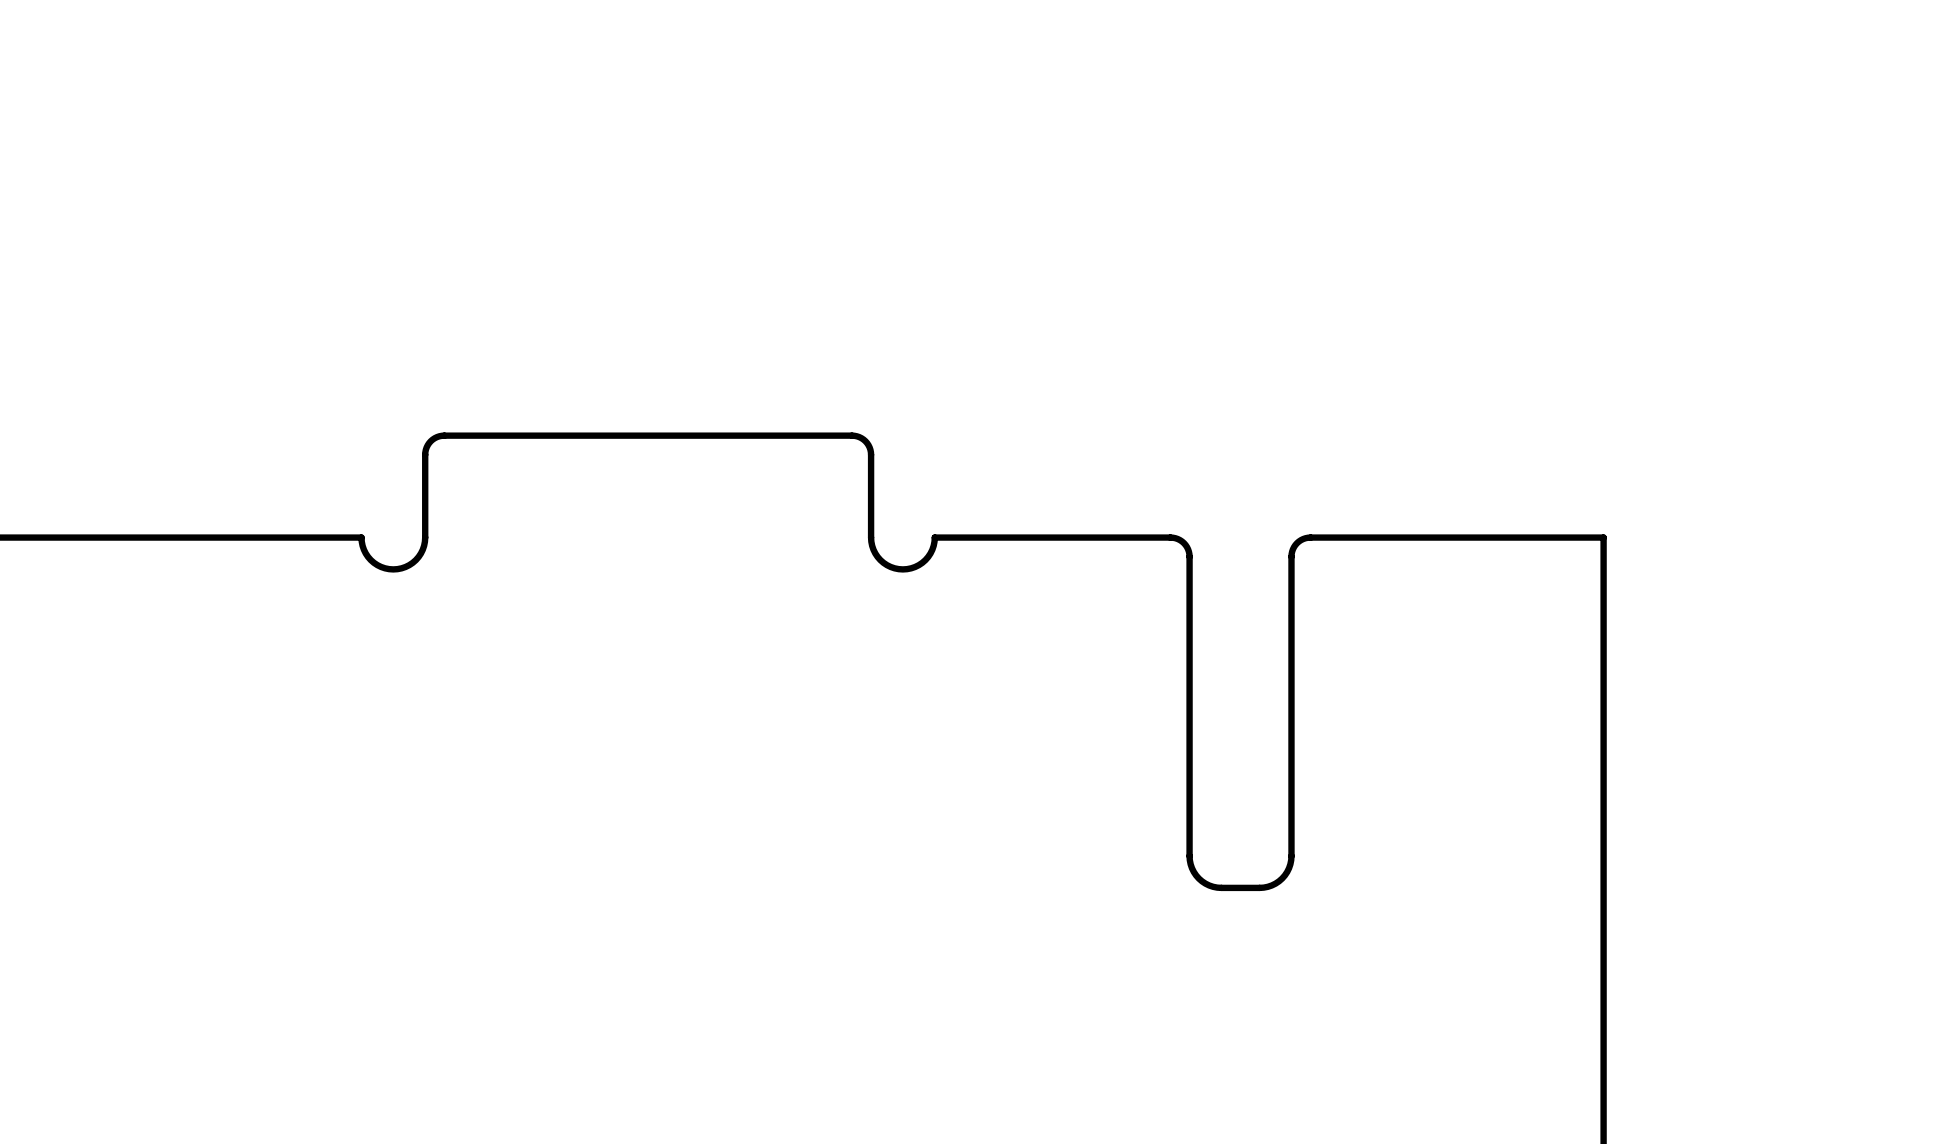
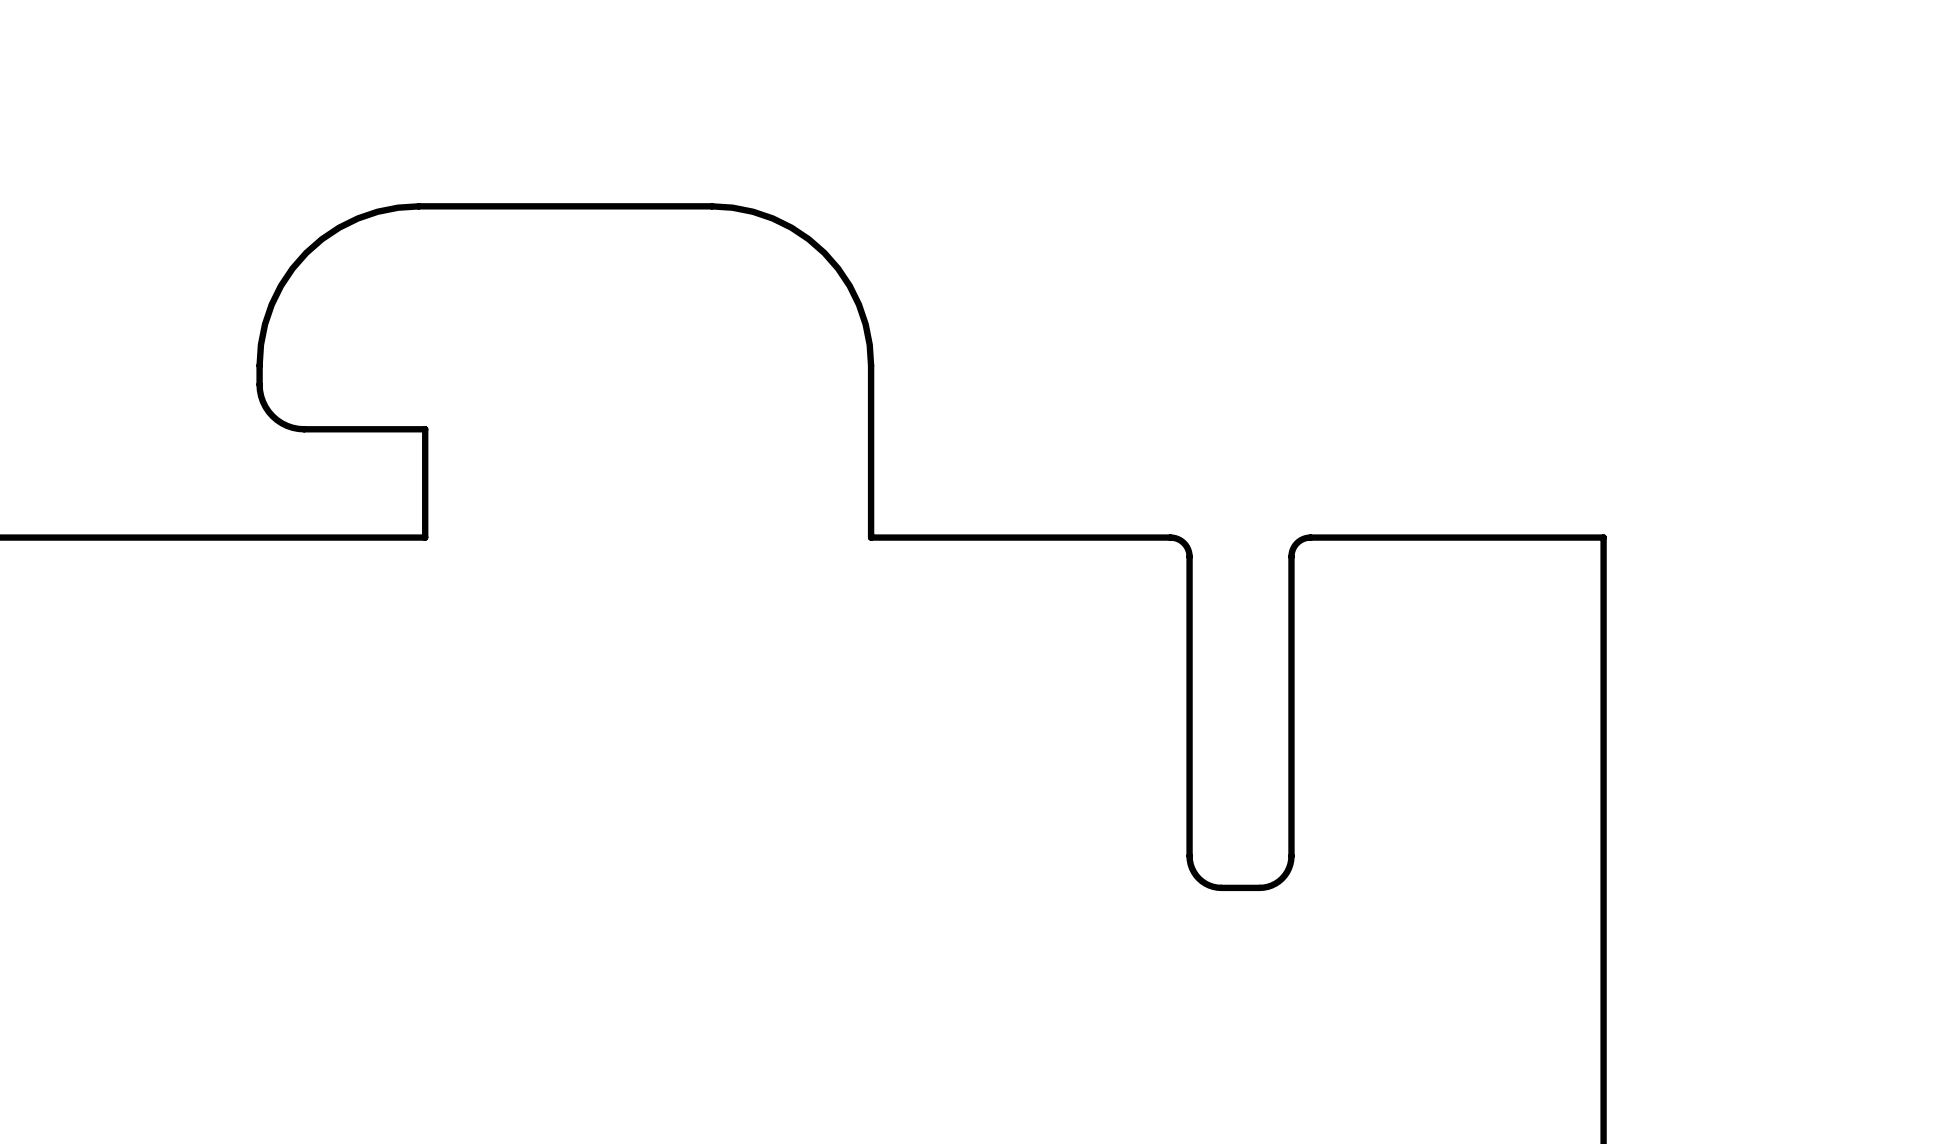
board edge: (425, 454) (430, 441) (444, 435) (851, 435) (865, 441) (871, 454) -> (425, 454) (425, 429) (292, 427) (281, 423) (272, 416) (265, 406) (259, 390) (260, 344) (265, 324) (280, 285) (292, 268) (321, 239) (339, 227) (357, 218) (398, 207) (711, 206) (753, 211) (791, 227) (808, 239) (838, 268) (858, 304) (869, 344) (871, 454)
board edge: (361, 537) (363, 549) (370, 560) (381, 566) (393, 569) (405, 566) (415, 560) (422, 549) (425, 537) -> (361, 537) (425, 537)
board edge: (871, 537) (873, 549) (880, 560) (890, 566) (902, 569) (915, 566) (925, 560) (932, 549) (934, 537) -> (871, 537) (934, 537)

